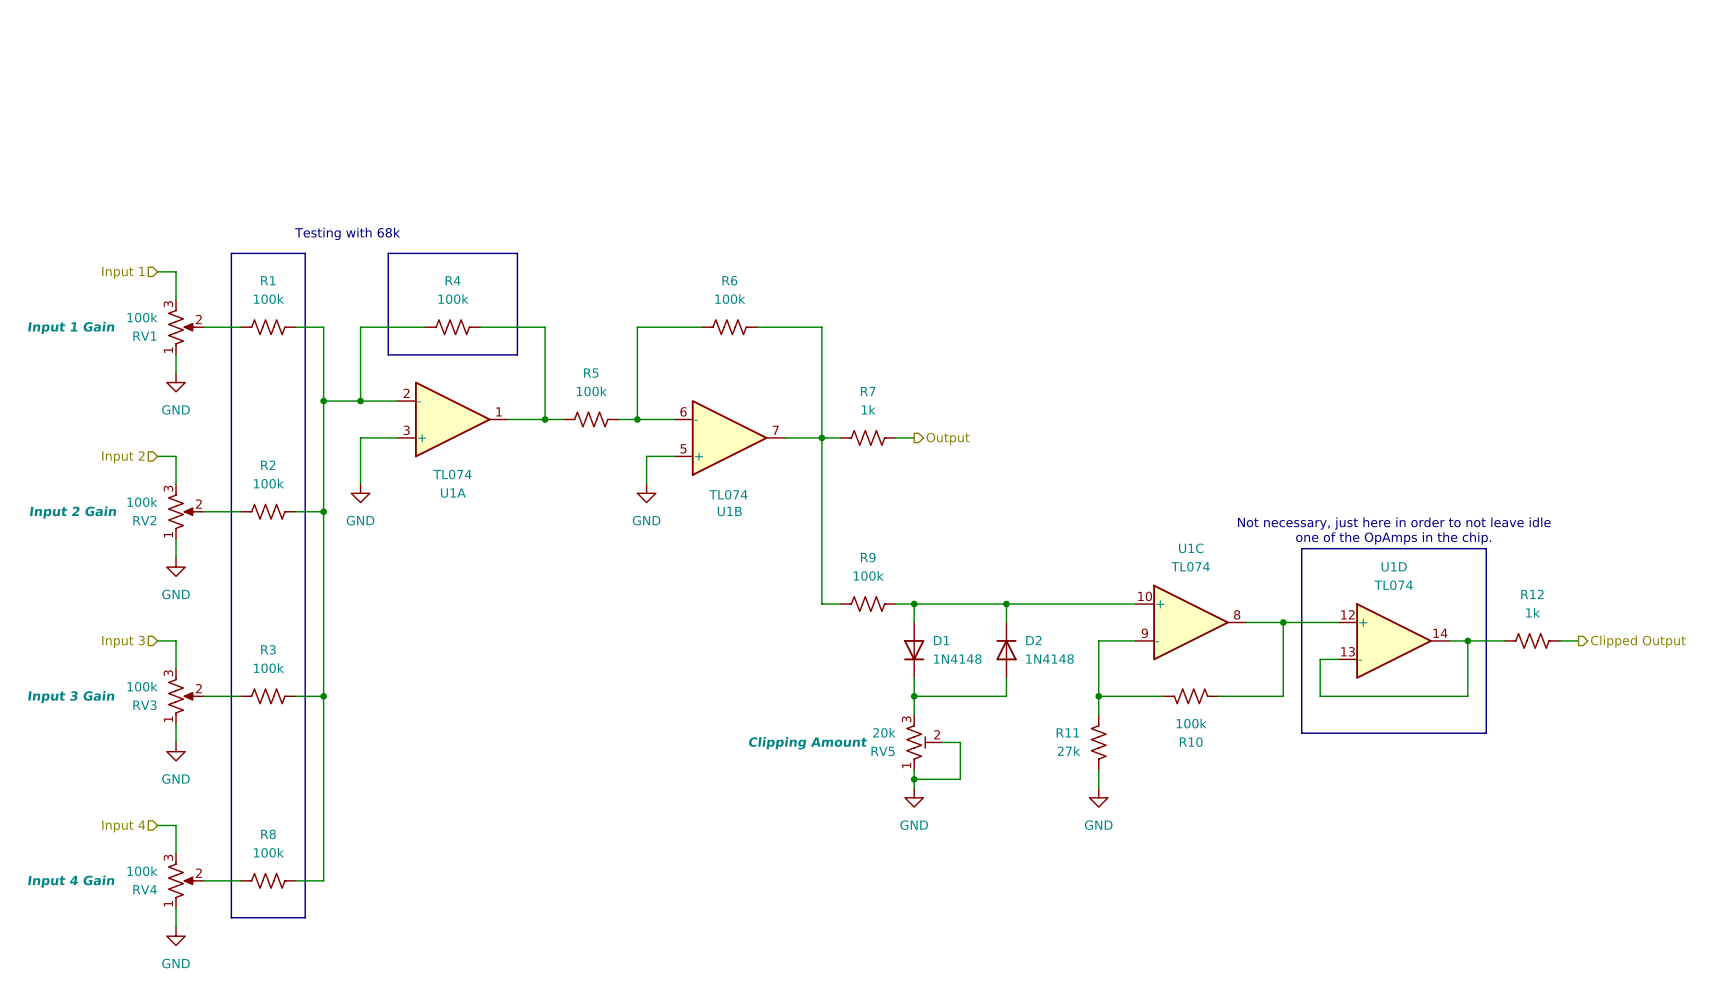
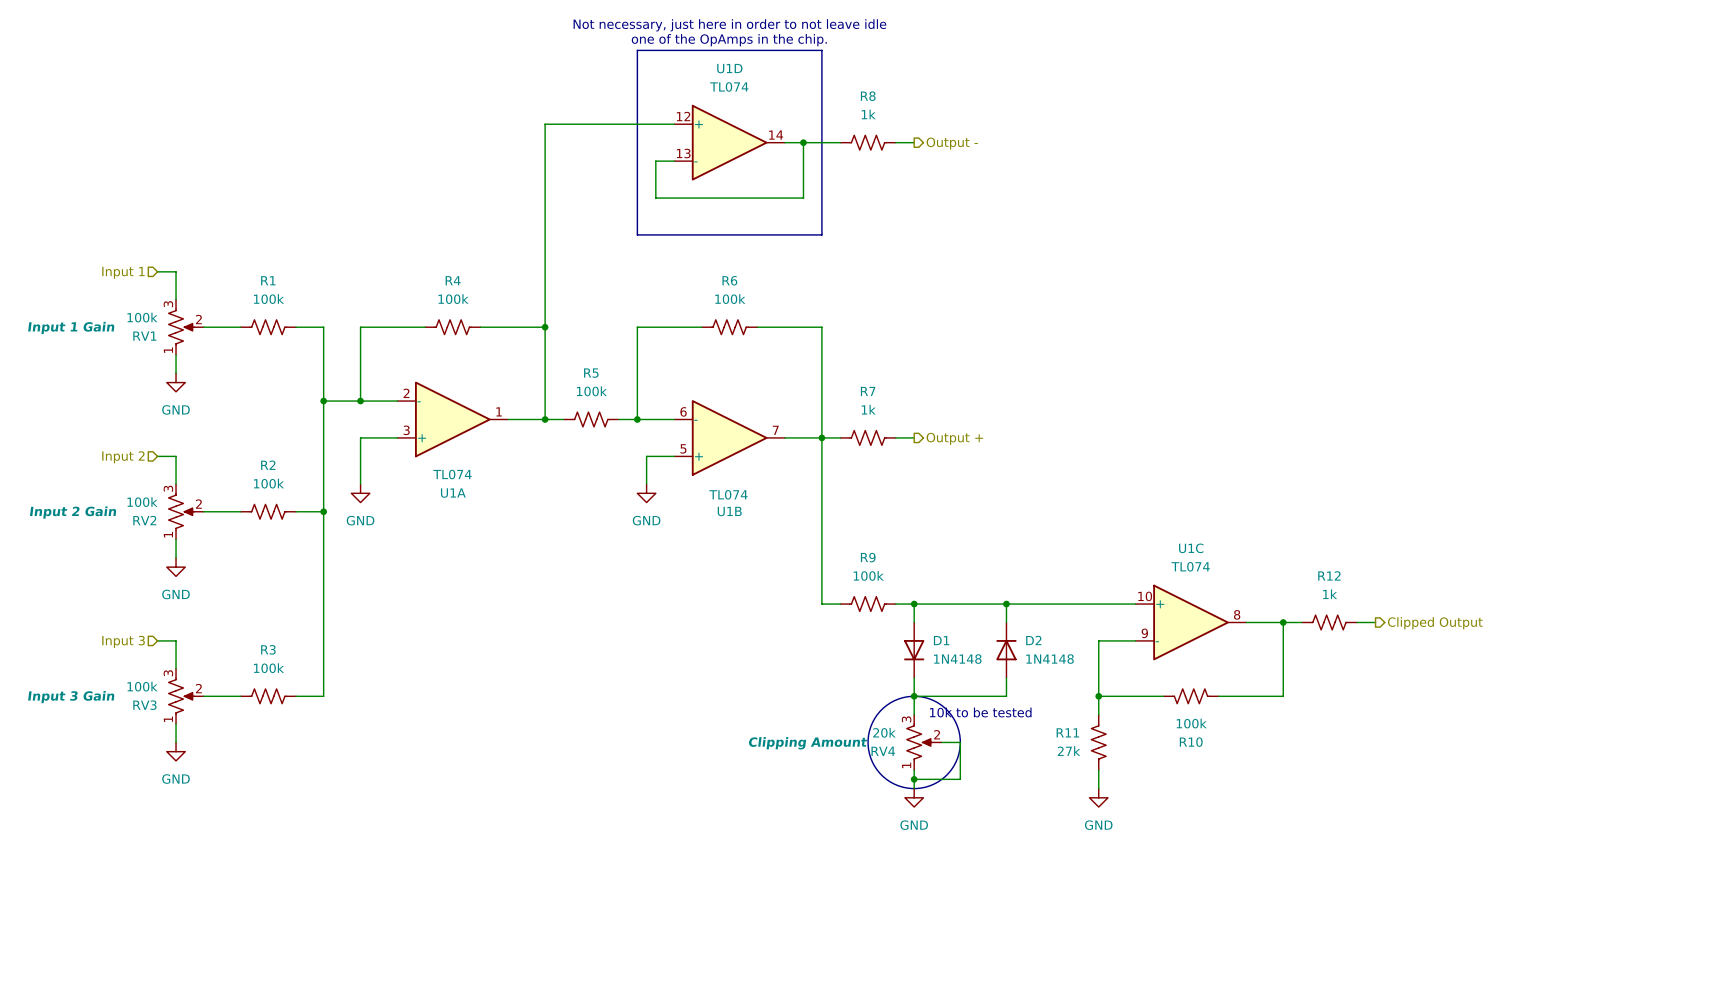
text: none -> Not necessary, just here in order to not leave idle (729, 25)
text: none -> one of the OpAmps in the chip. (729, 40)
line: none -> (637, 50) (821, 50) (821, 234) (637, 234) (637, 50)
wire: none -> (674, 124) (545, 124) (545, 327)
wire: none -> (785, 142) (840, 142)
wire: none -> (803, 142) (803, 198) (655, 198) (655, 161) (674, 161)
junction: none -> (803, 142)
wire: none -> (895, 142) (914, 142)
hierarchical label: none -> Output - (952, 143)
text: Testing with 68k (347, 233) -> none
line: (231, 253) (305, 253) (305, 917) (231, 917) (231, 253) -> none
line: (388, 253) (517, 253) (517, 354) (388, 354) (388, 253) -> none
junction: none -> (545, 327)
hierarchical label: Output (948, 438) -> Output + (954, 438)
text: Not necessary, just here in order to not leave idle (1394, 523) -> none
text: one of the OpAmps in the chip. (1393, 538) -> none
line: (1301, 548) (1486, 548) (1486, 733) (1301, 733) (1301, 548) -> none
wire: (1301, 622) (1338, 622) -> none
hierarchical label: none -> Clipped Output (1435, 623)
U1D position: (1394, 640) -> (729, 142)
wire: (1449, 640) (1504, 640) -> none
wire: (1467, 640) (1467, 696) (1320, 696) (1320, 659) (1338, 659) -> none
junction: (1467, 640) -> none
R12 position: (1532, 640) -> (1329, 622)
wire: (1560, 640) (1578, 640) -> none
hierarchical label: Clipped Output (1638, 641) -> none
wire: (323, 696) (323, 880) (295, 880) -> none
junction: (323, 696) -> none
drawing: none -> [868, 696, 961, 789]
text: none -> 10k to be tested (980, 712)
RV5: 20k (924, 742) -> none
wire: (157, 825) (176, 825) (176, 853) -> none
hierarchical label: Input 4 (123, 826) -> none
R8 value: 100k (268, 852) -> 1k (868, 114)
RV4 value: 100k (142, 871) -> 20k (884, 732)
RV4 position: (186, 880) -> (924, 742)
wire: (203, 880) (240, 880) -> none
R8 position: (268, 880) -> (868, 142)
RV4 text: Input 4 Gain (71, 881) -> Clipping Amount (807, 743)
wire: (176, 908) (176, 926) -> none
power symbol: GND (176, 936) -> none

